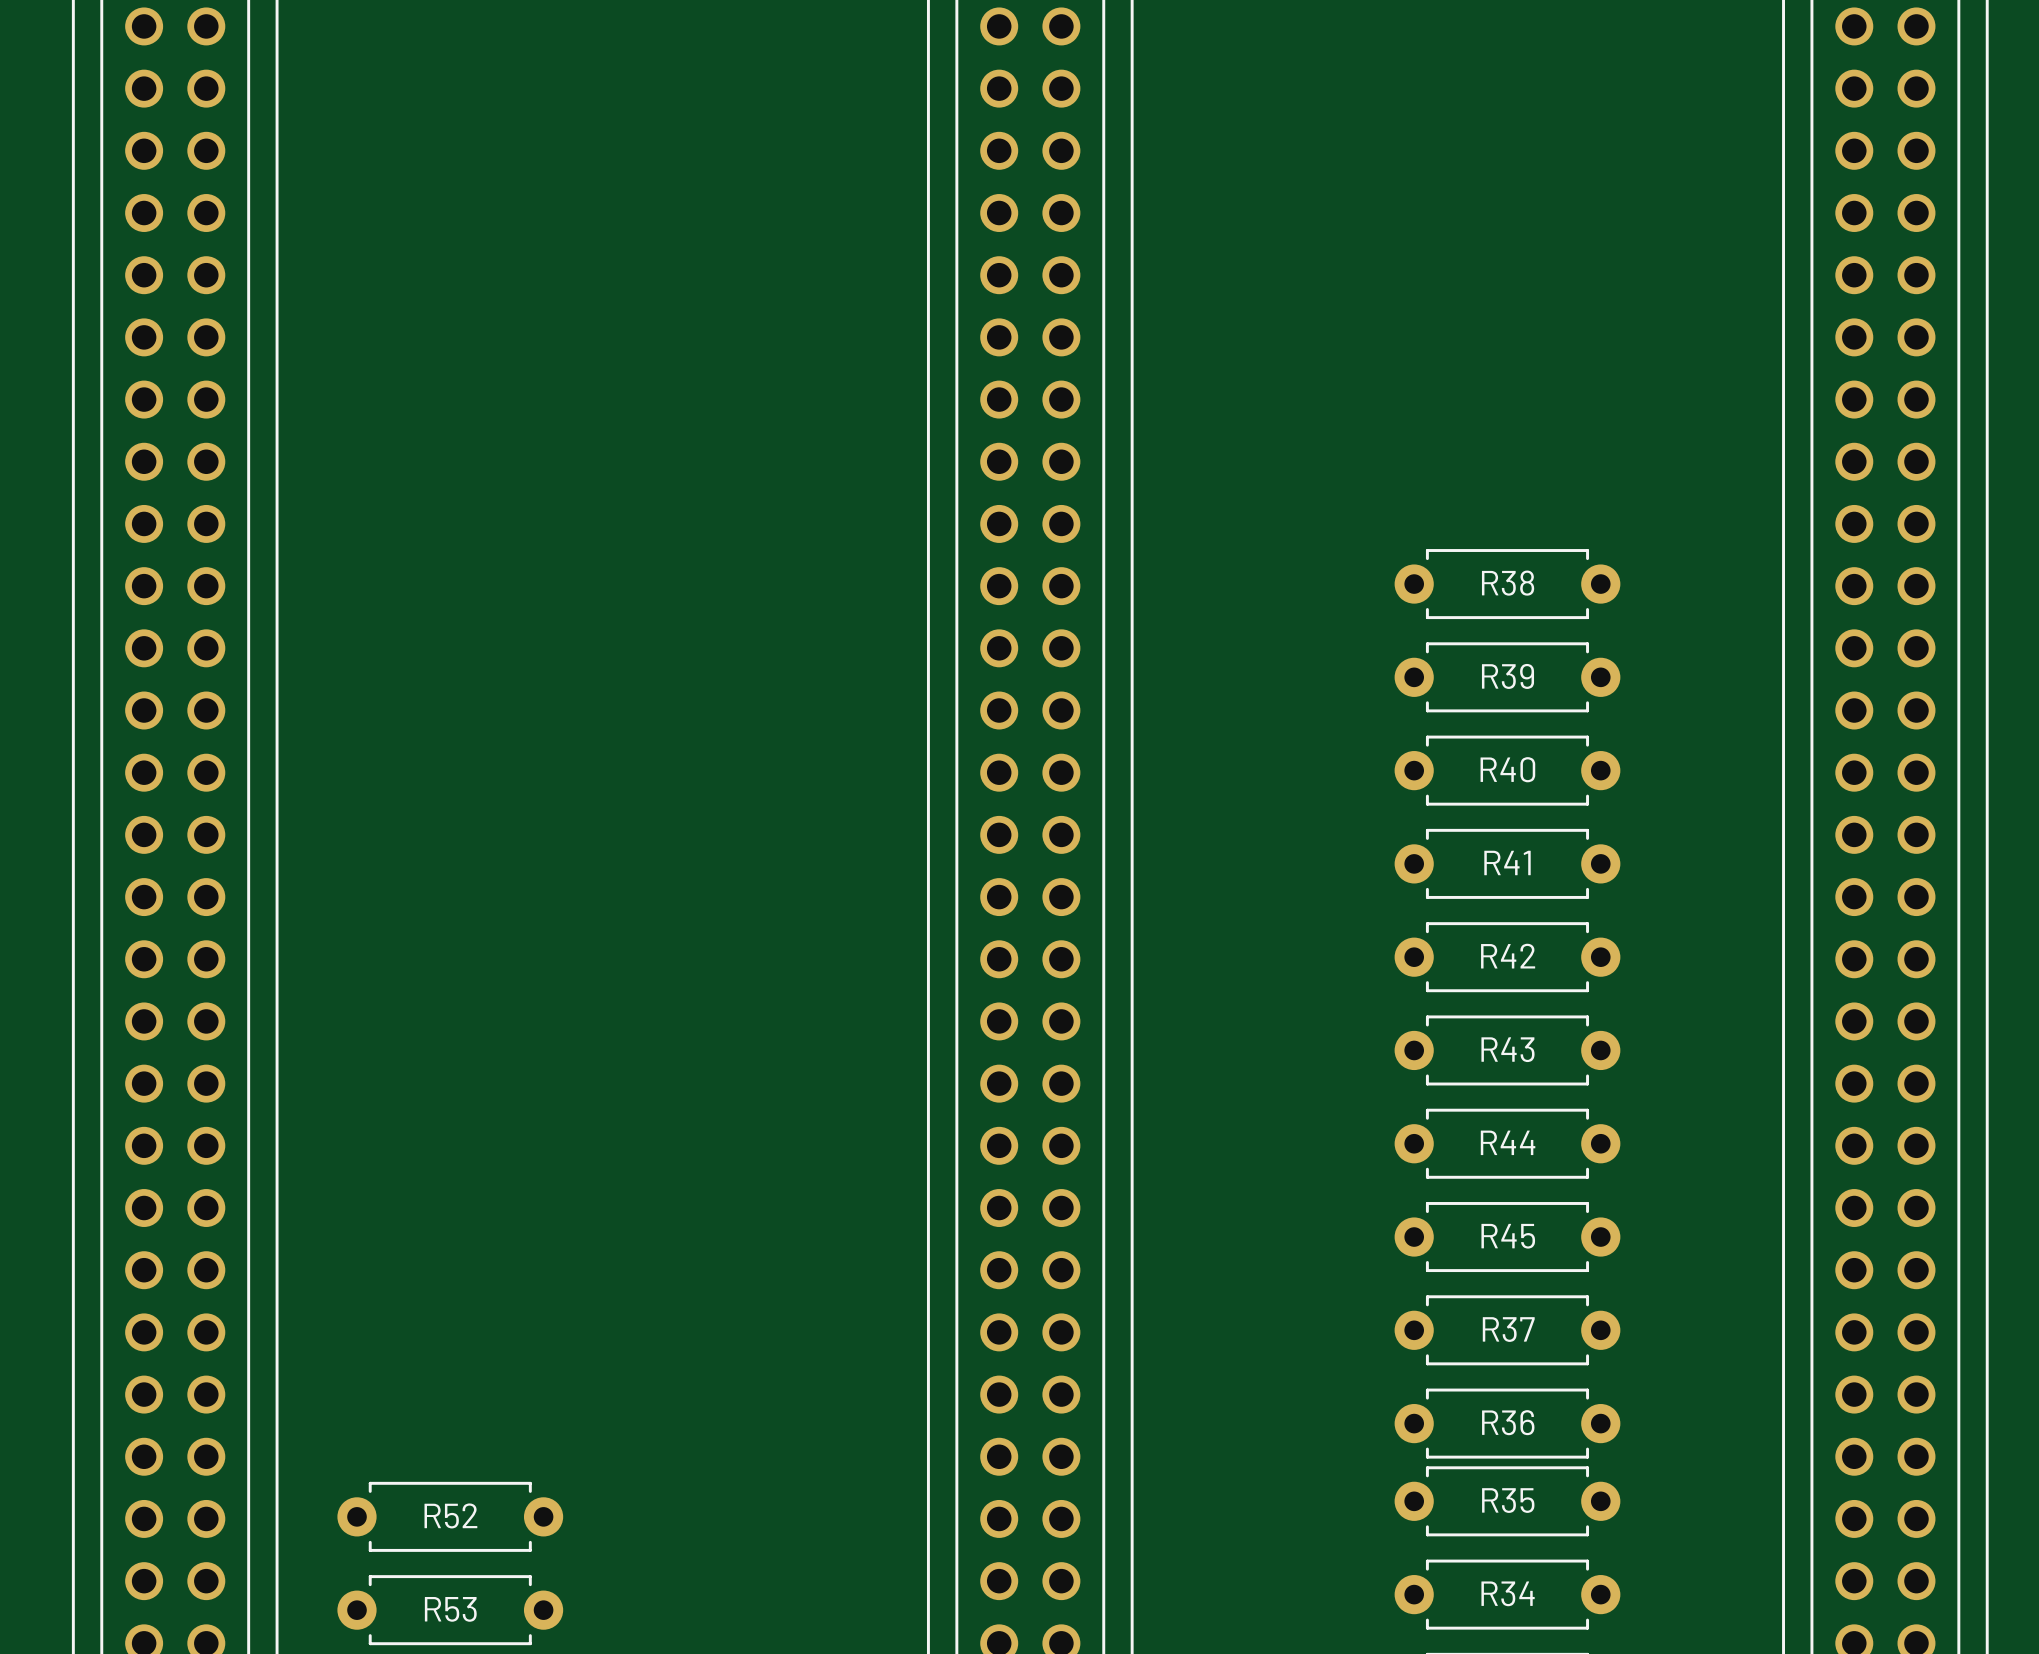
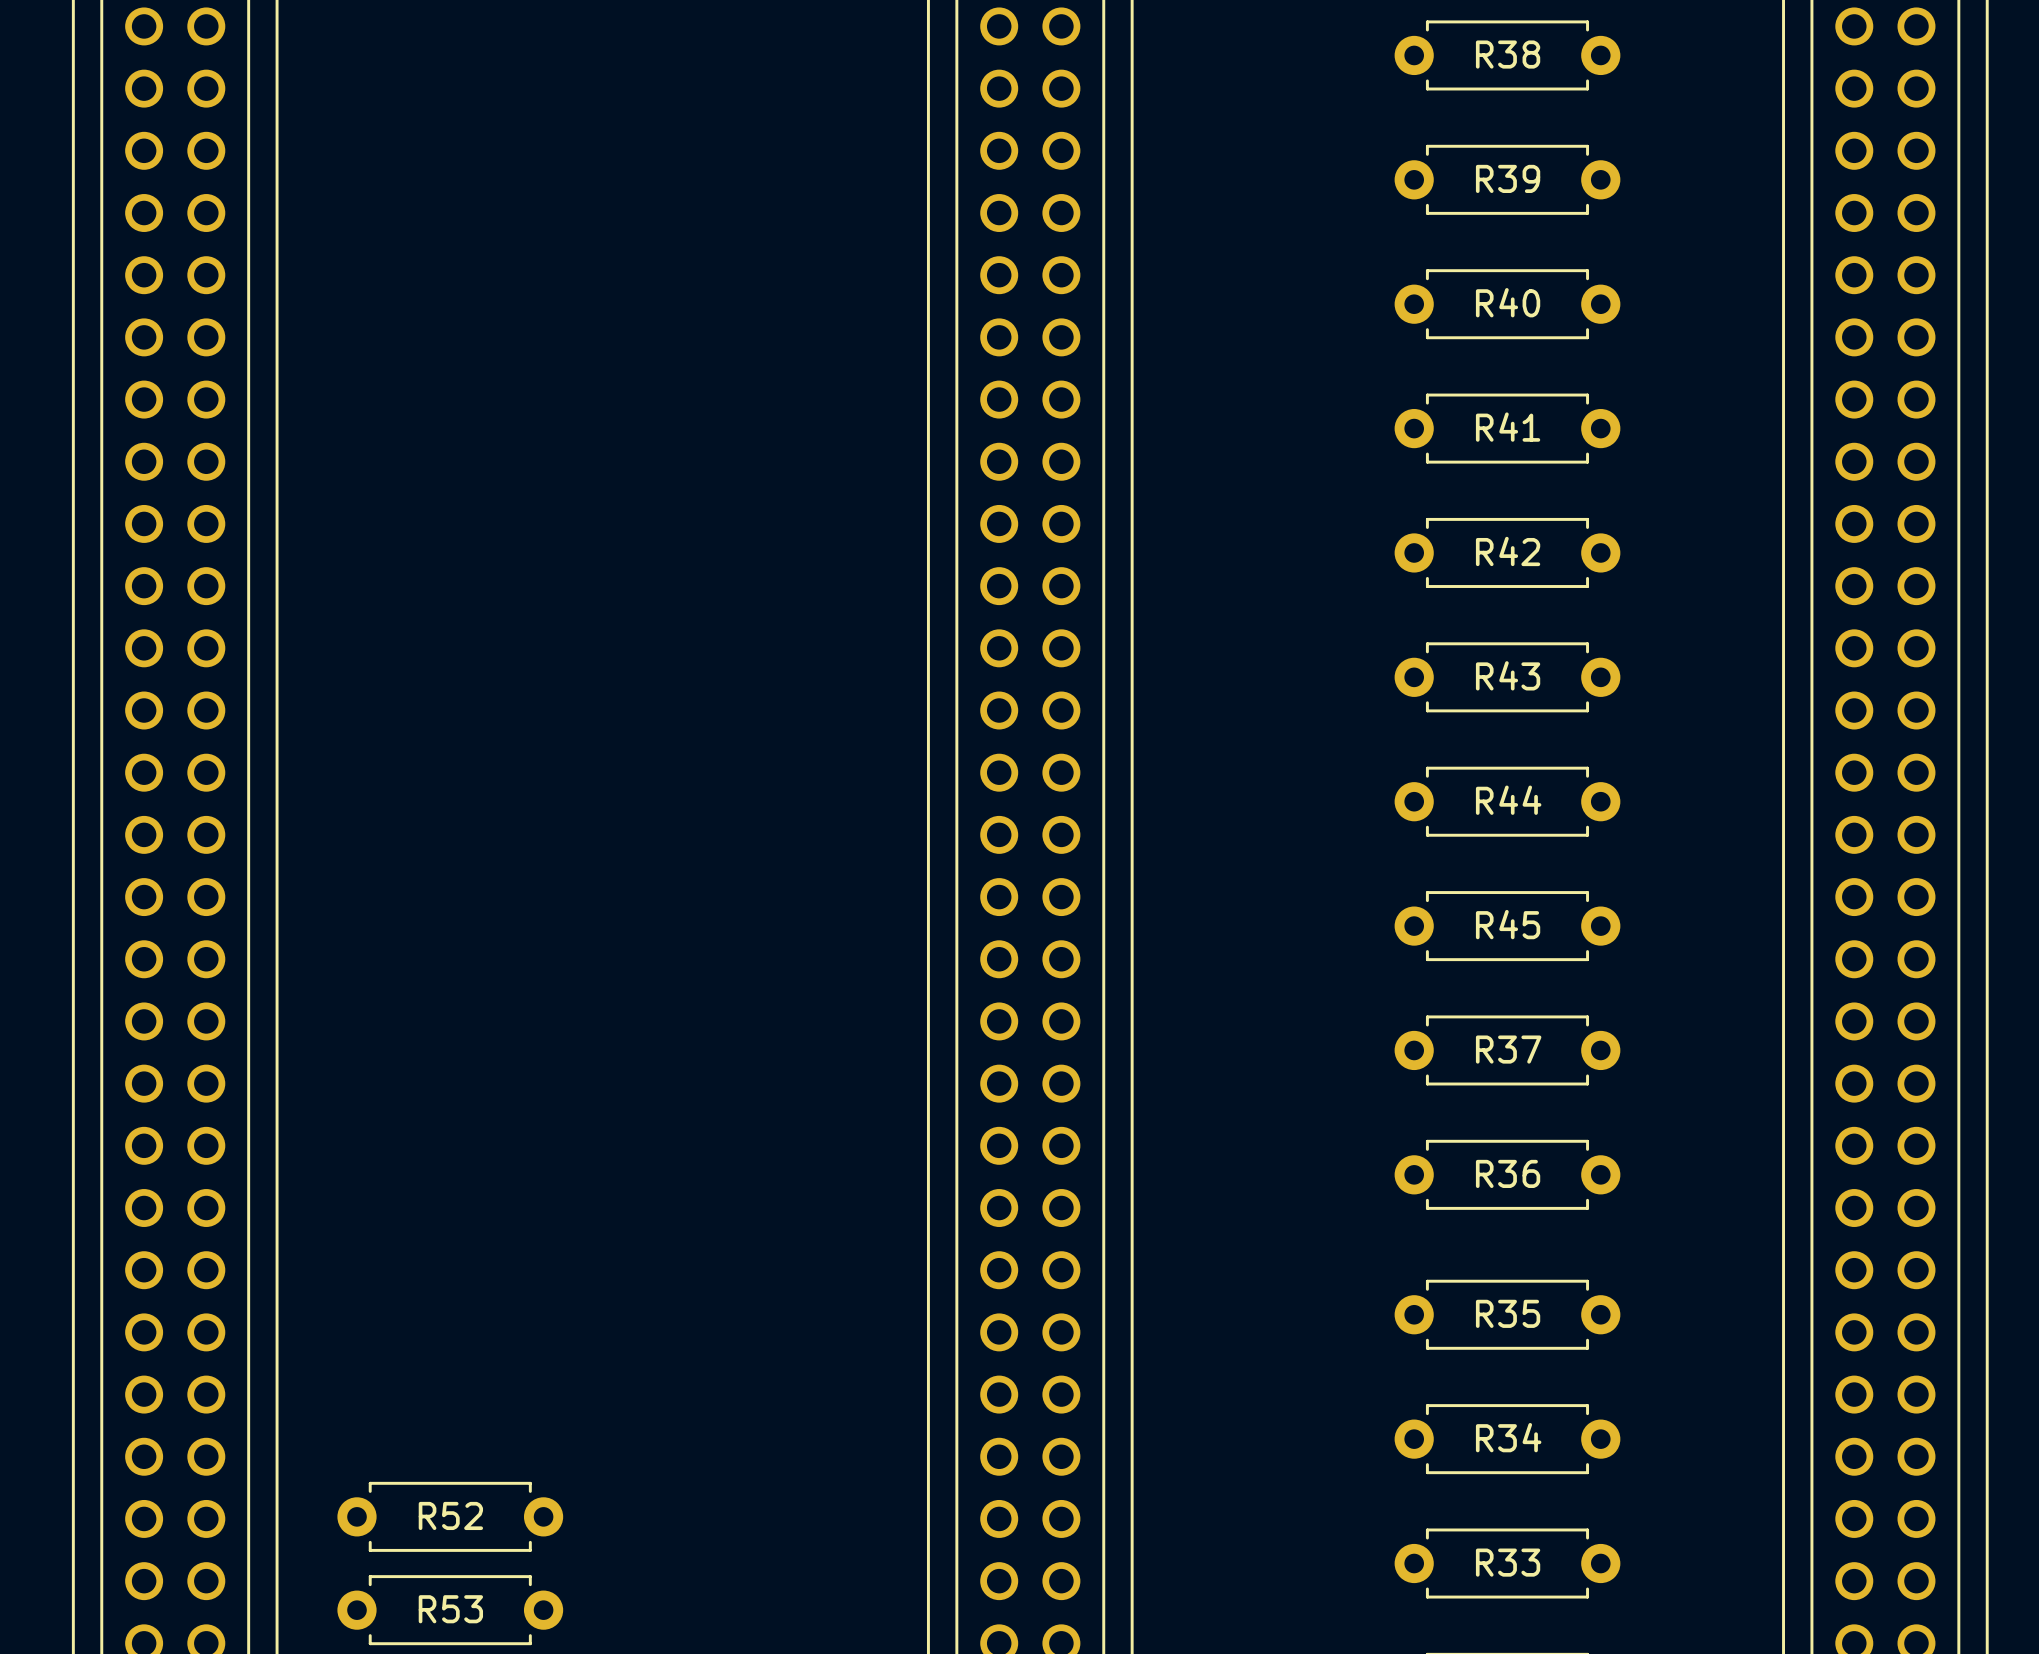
R39: none -> (1507, 179)
R38 position: (1507, 584) -> (1507, 55)
R39 name: R39 (1507, 676) -> R43 (1508, 675)
R40 position: (1507, 770) -> (1507, 304)
R41 position: (1507, 863) -> (1507, 428)
R42 position: (1507, 957) -> (1507, 552)
R43 name: R43 (1507, 1049) -> R37 (1508, 1049)
R44 position: (1507, 1143) -> (1507, 801)
R45 position: (1507, 1237) -> (1507, 926)
R37: (1507, 1330) -> none
R36 position: (1507, 1423) -> (1507, 1174)
R35 position: (1507, 1501) -> (1507, 1314)
R33: none -> (1507, 1563)
R34 position: (1507, 1594) -> (1507, 1439)

